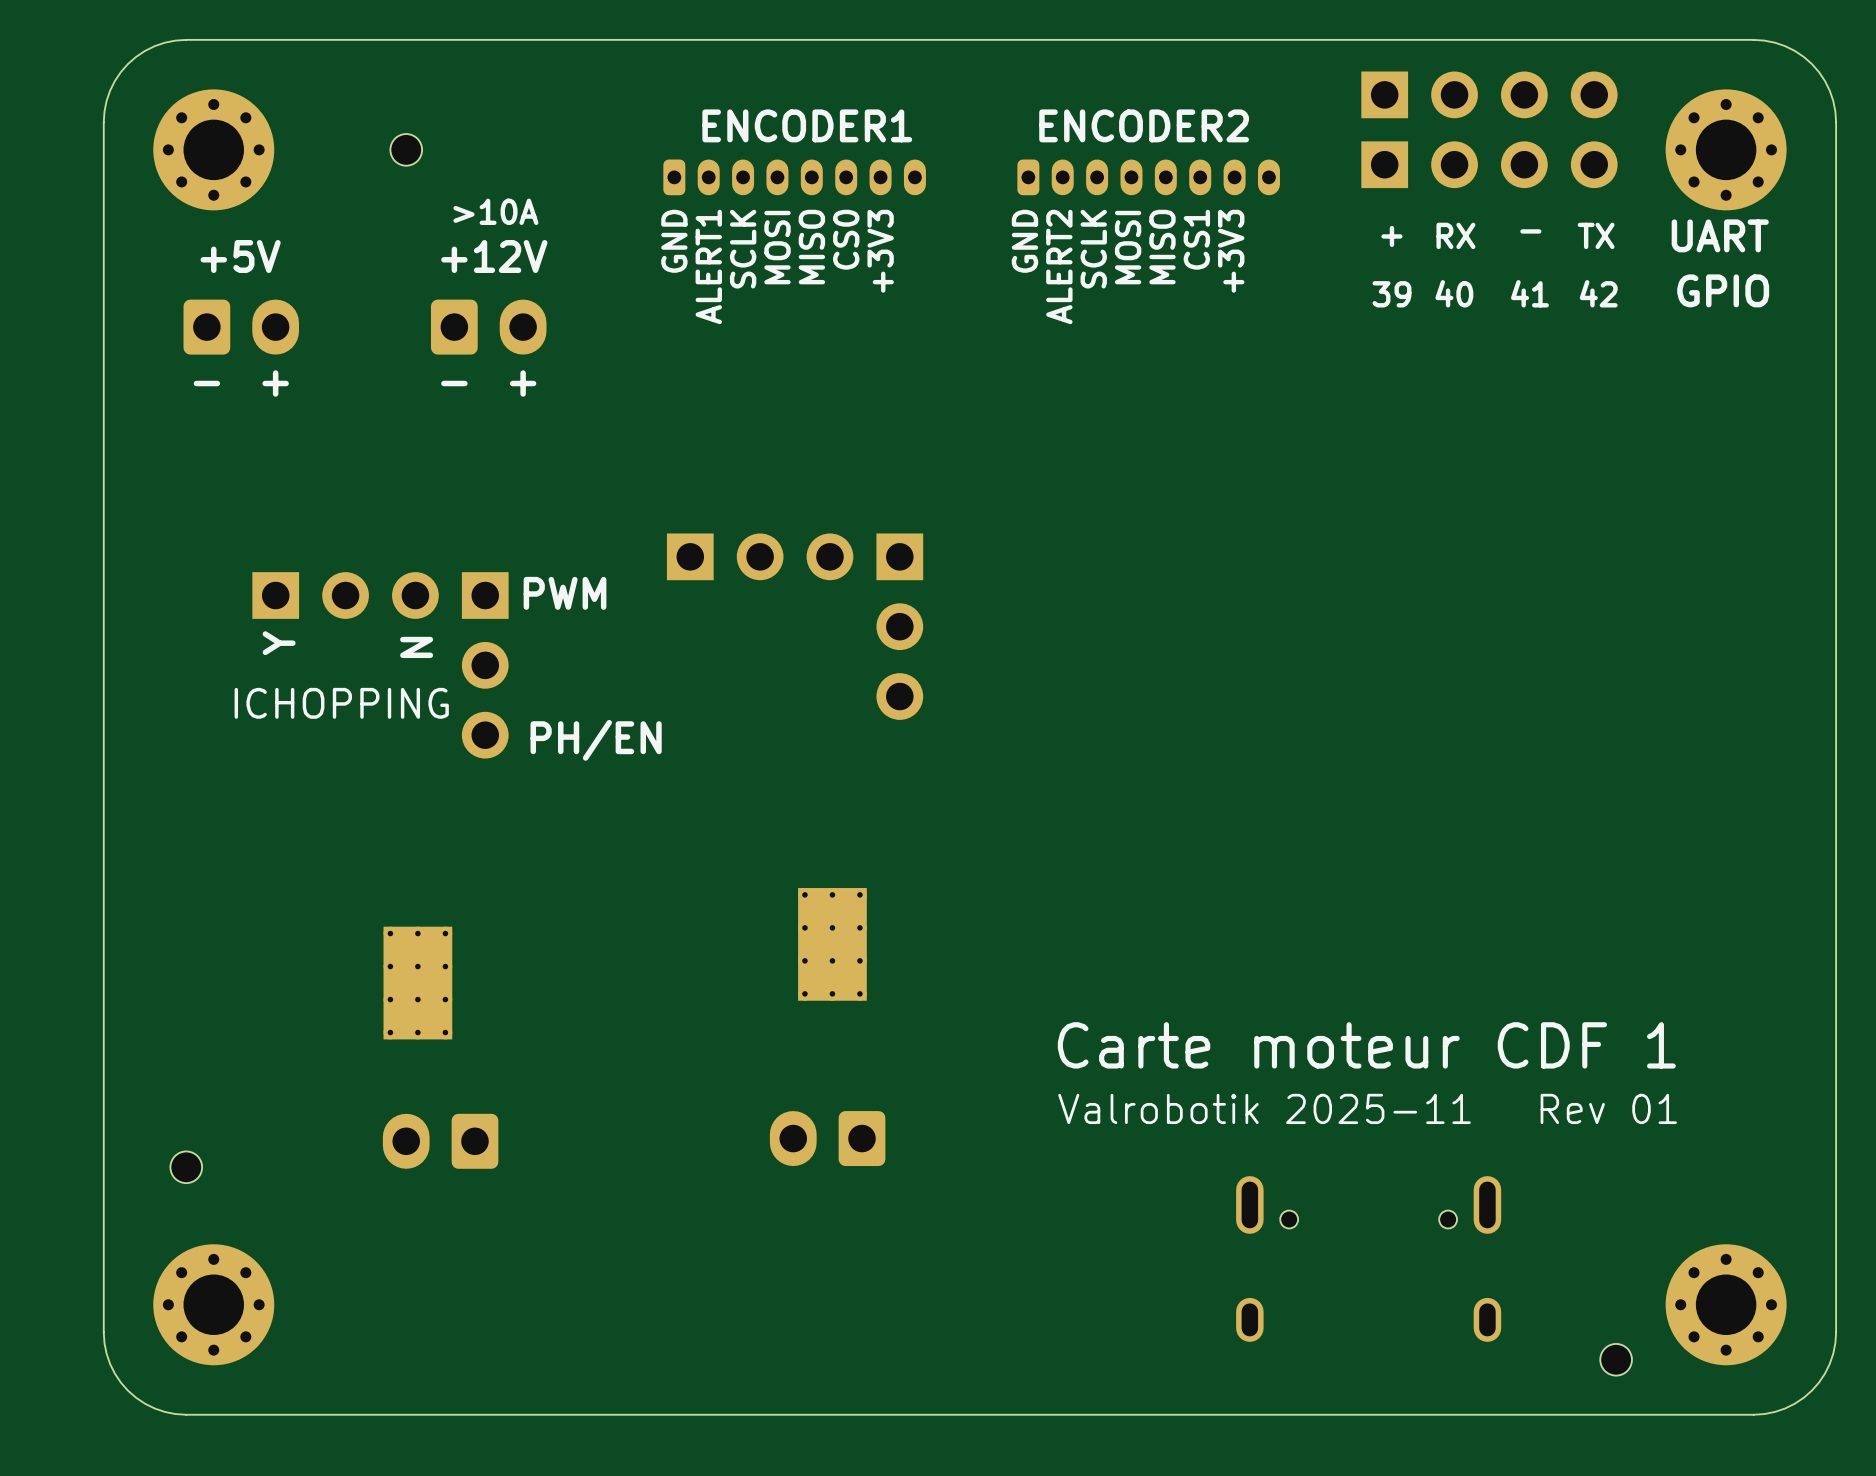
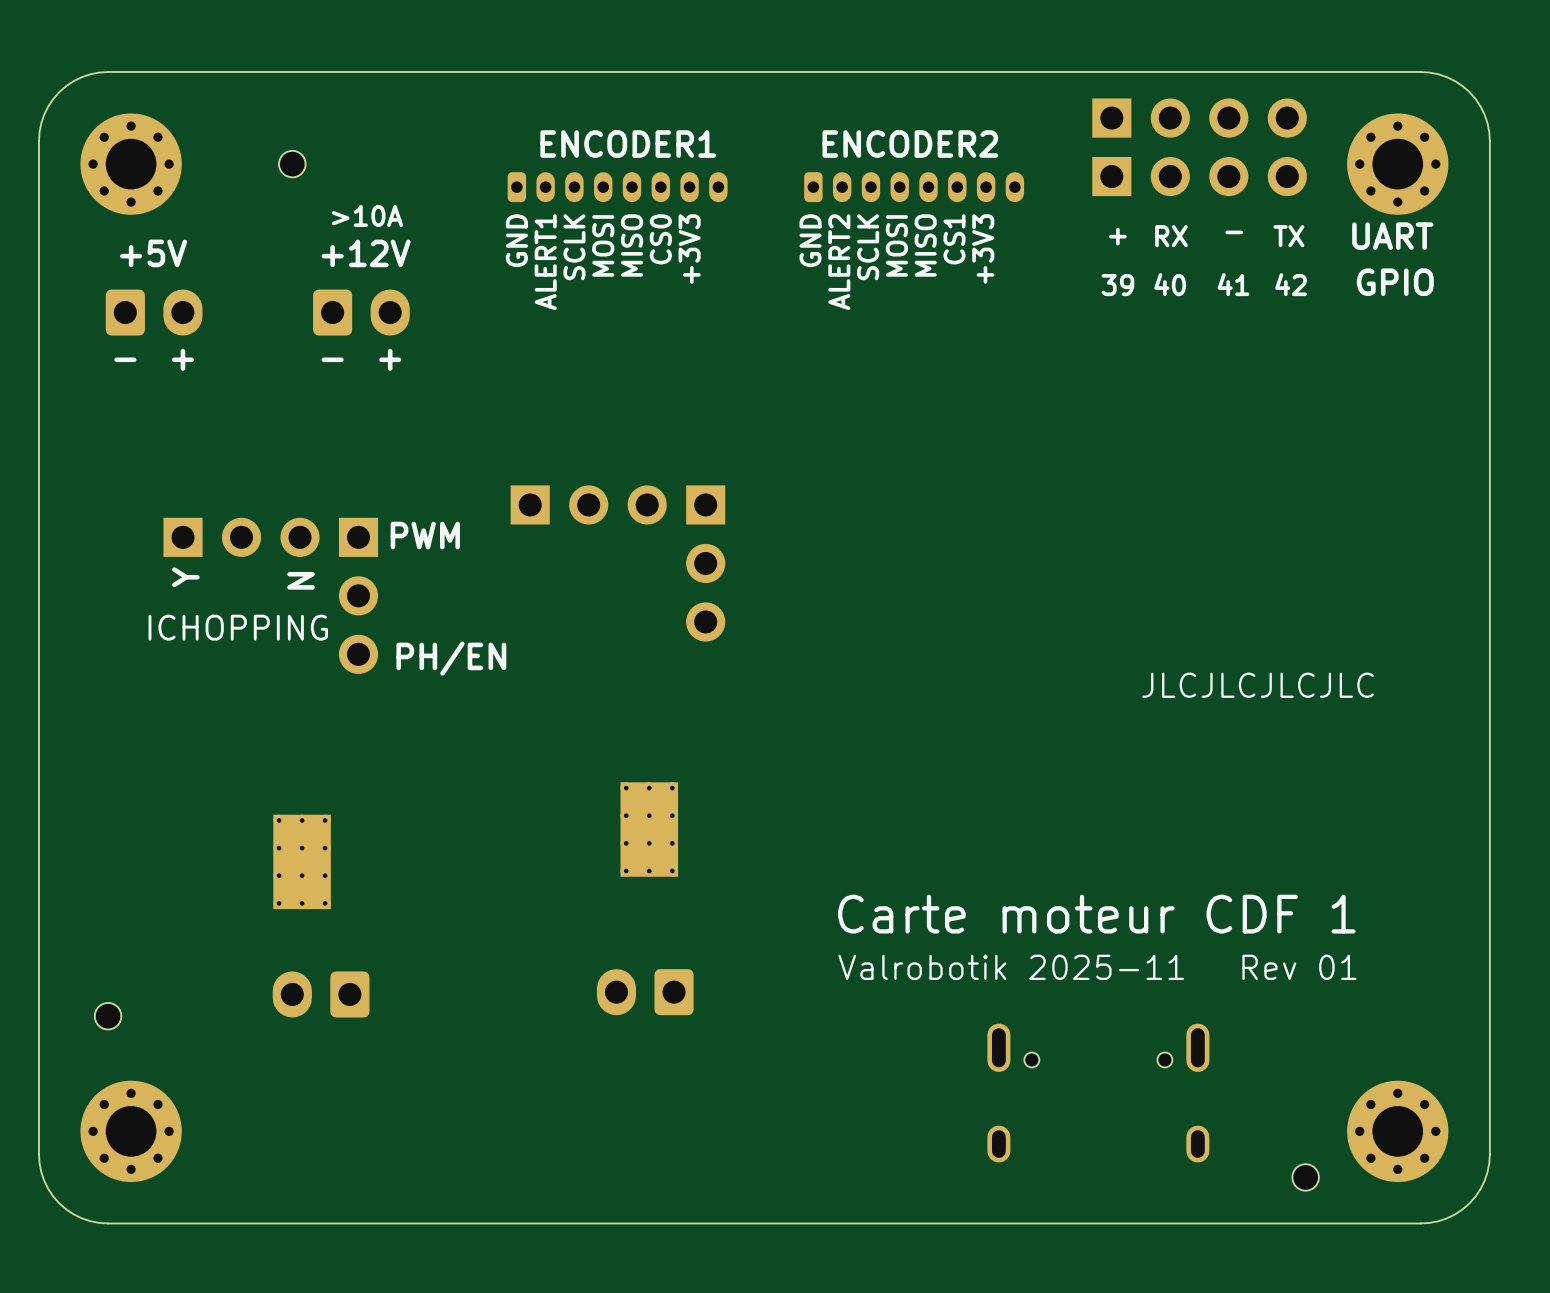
text: none -> JLCJLCJLCJLC (1258, 685)

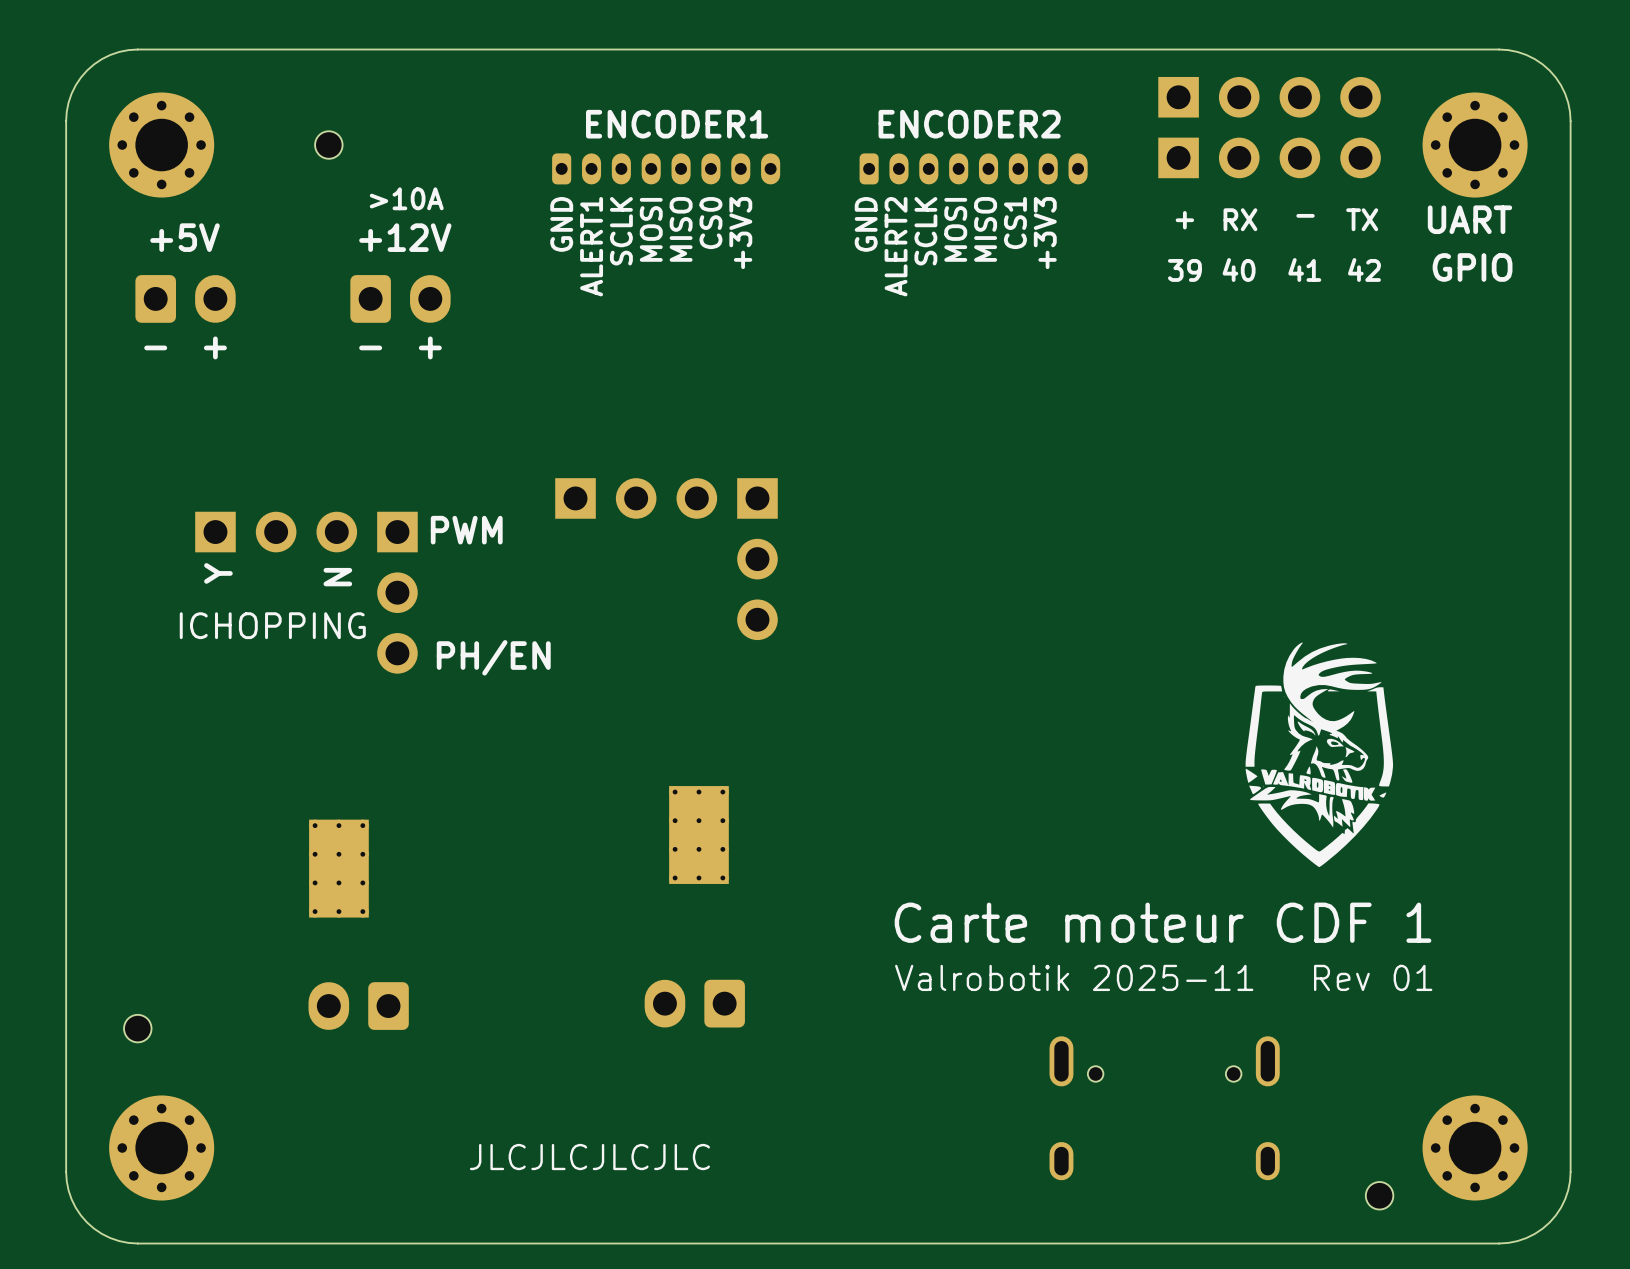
drawing: none -> [1245, 642, 1394, 868]
text: JLCJLCJLCJLC (1258, 685) -> none
text: none -> JLCJLCJLCJLC (589, 1157)

